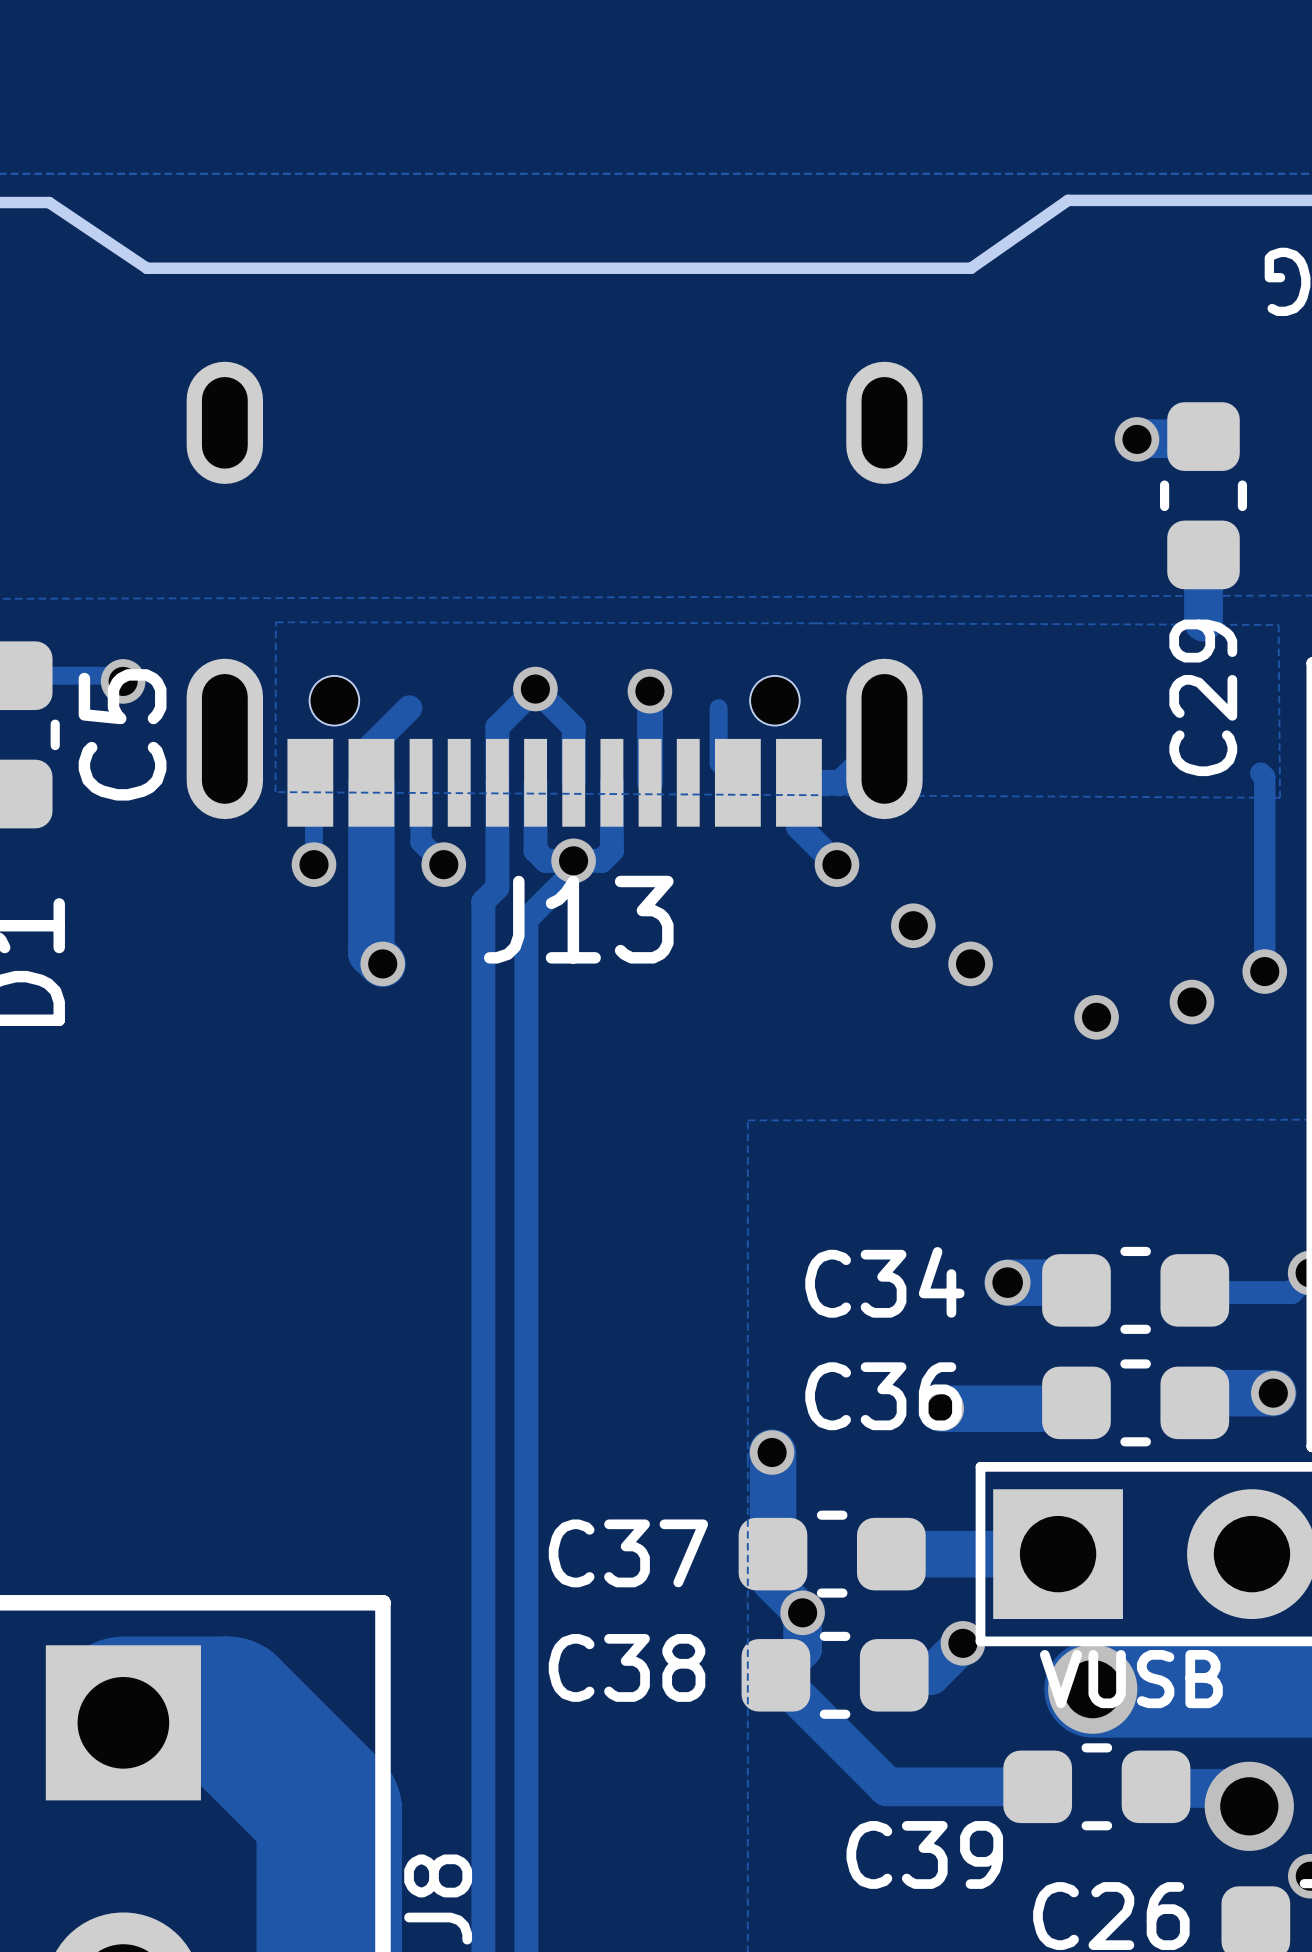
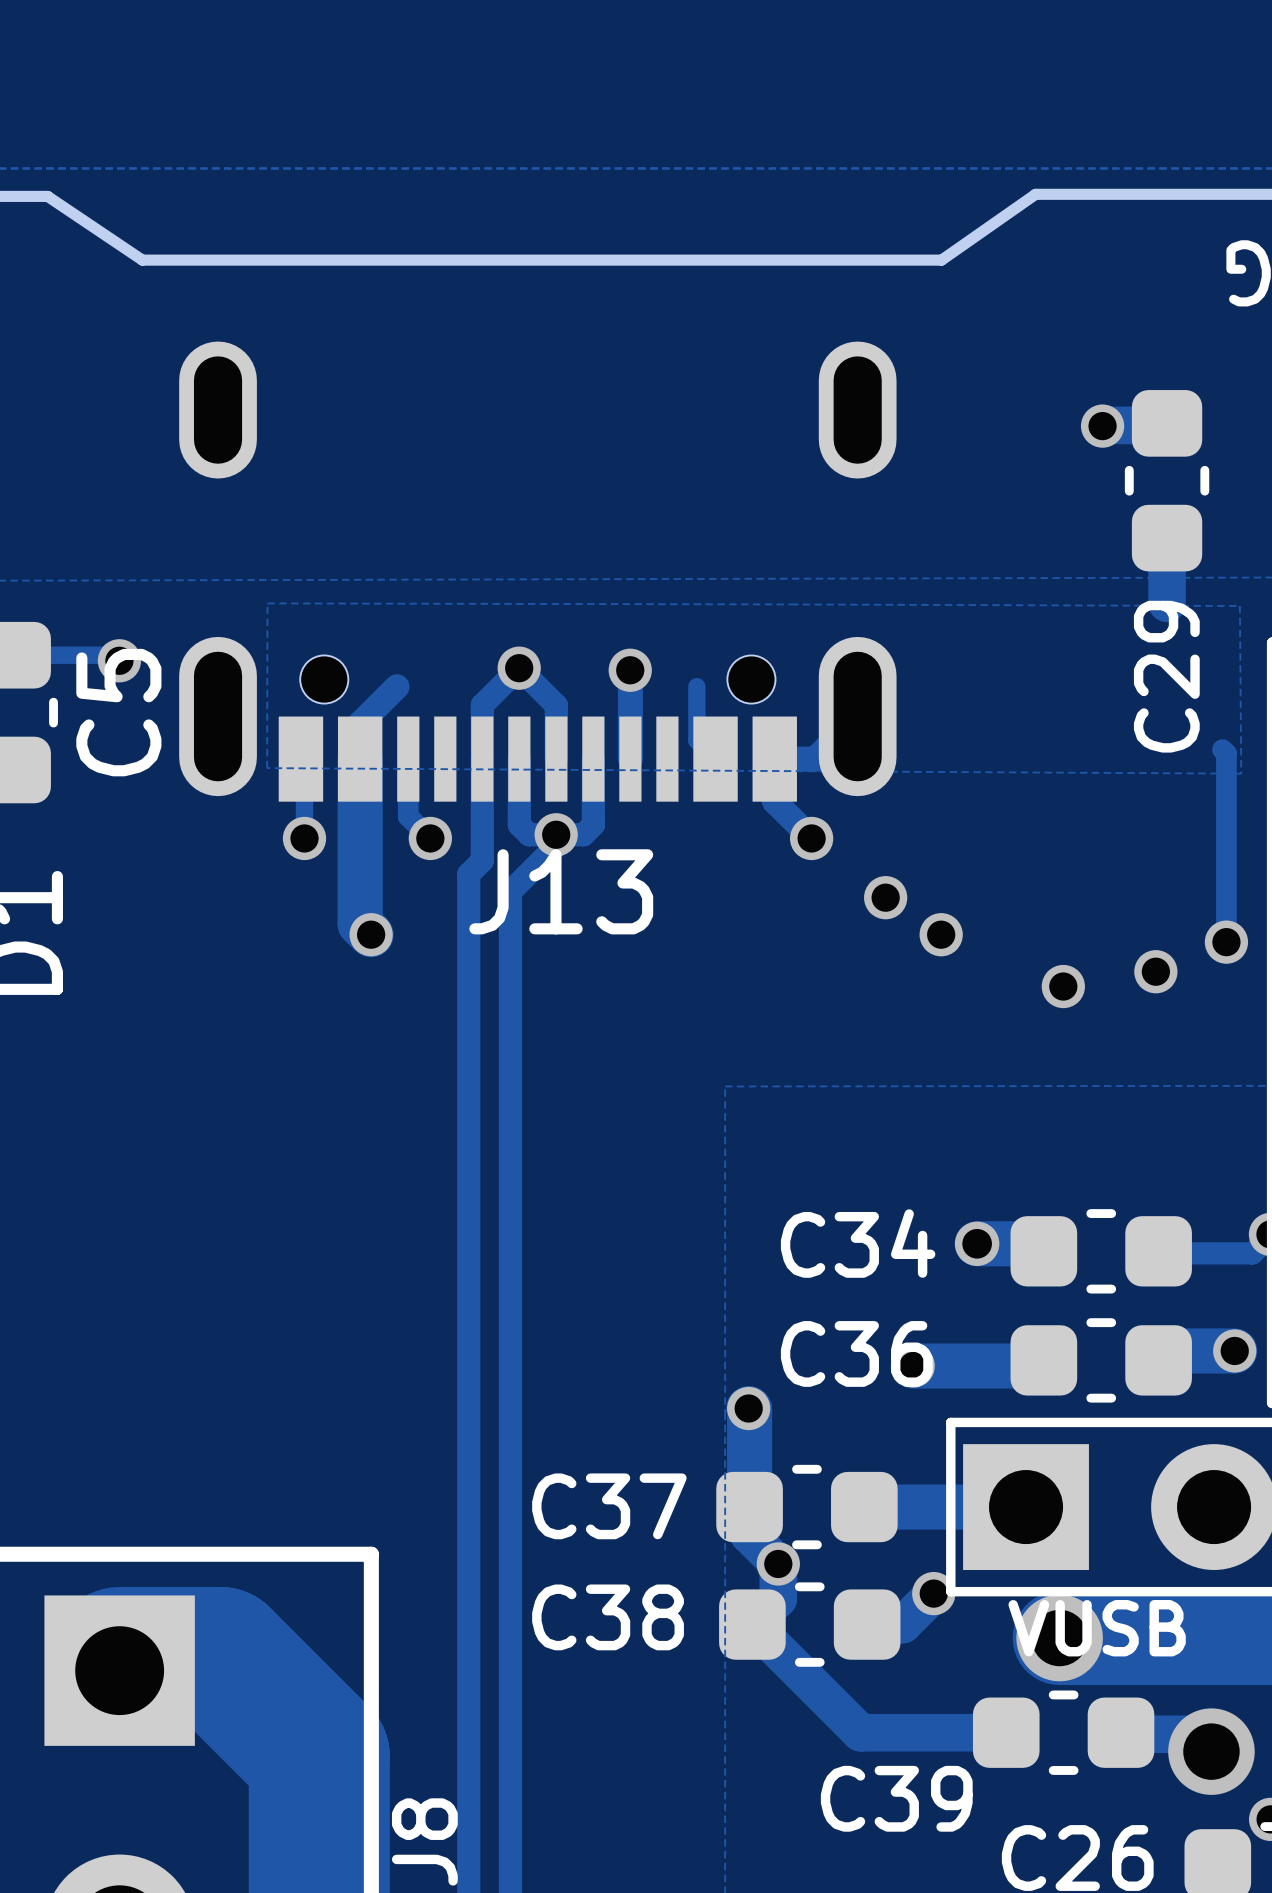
J13 footprint: [186, 361, 923, 827] -> [179, 341, 897, 802]

